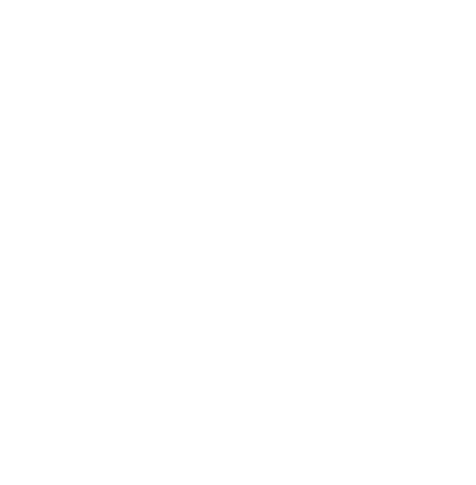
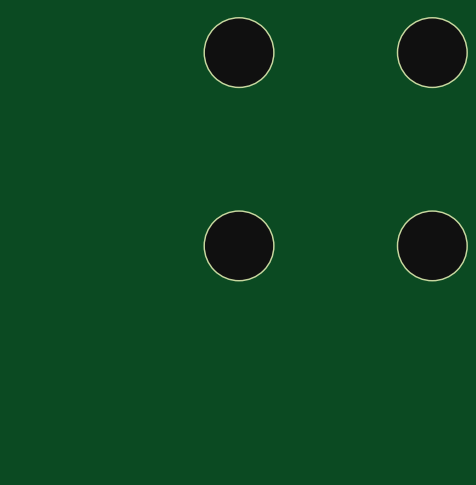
part: none -> (239, 52)
part: none -> (432, 52)
part: none -> (239, 245)
part: none -> (432, 245)

